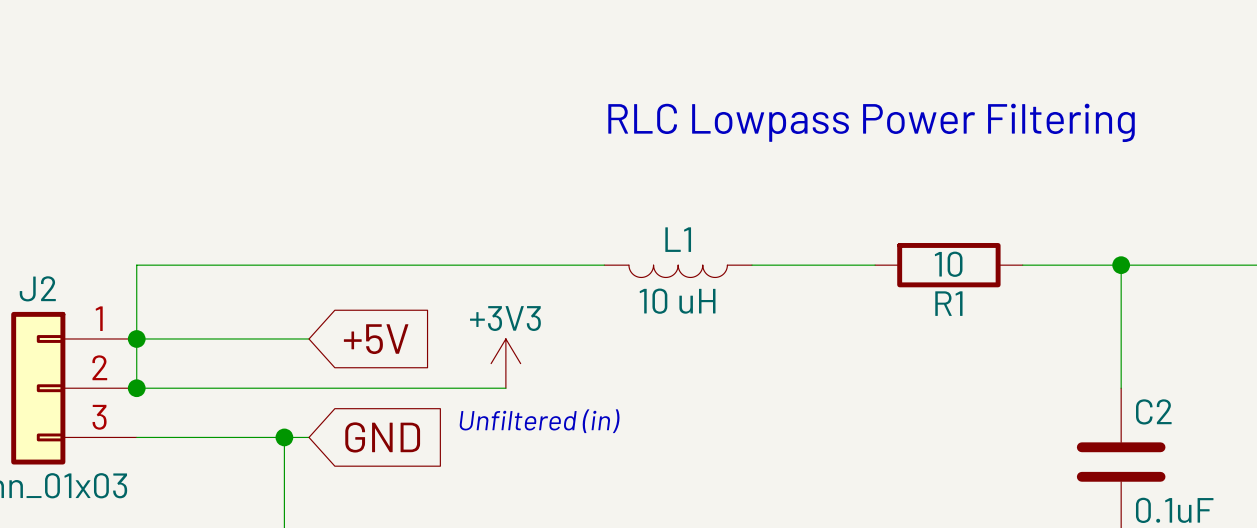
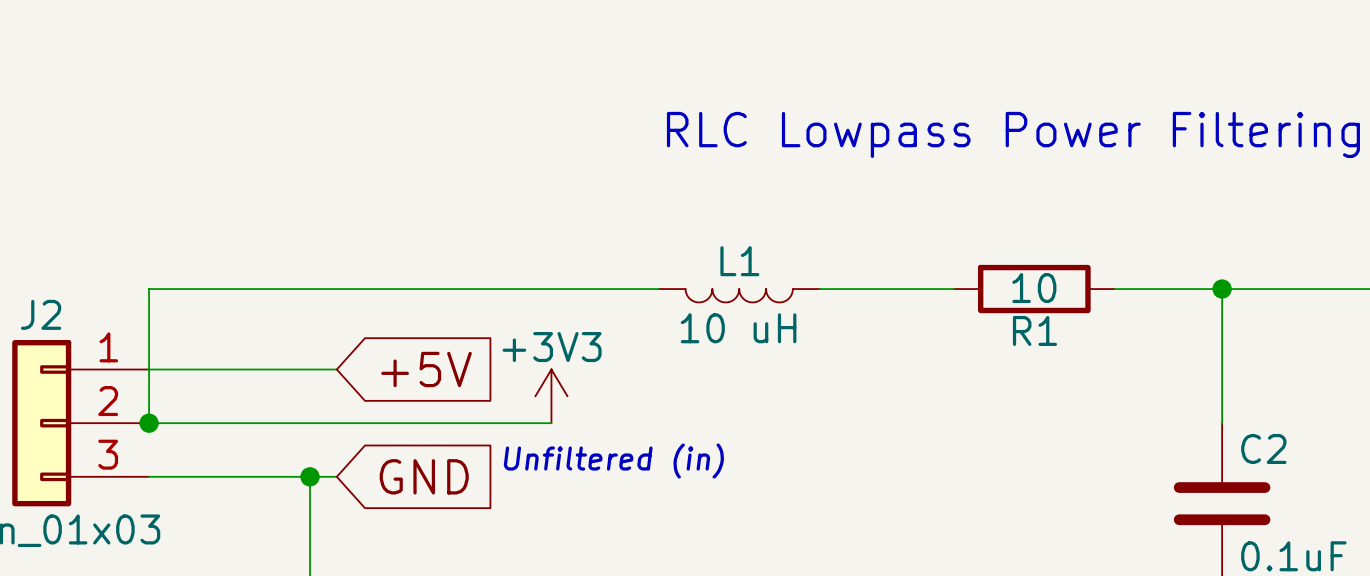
junction: (136, 338) -> none

